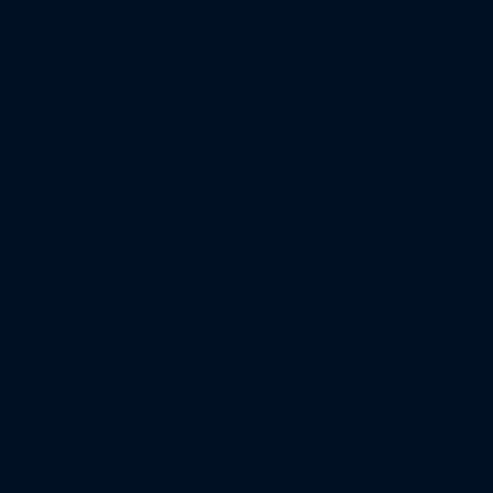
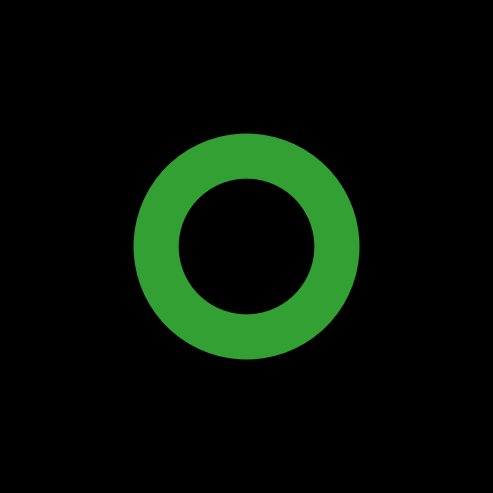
part: none -> (246, 246)

